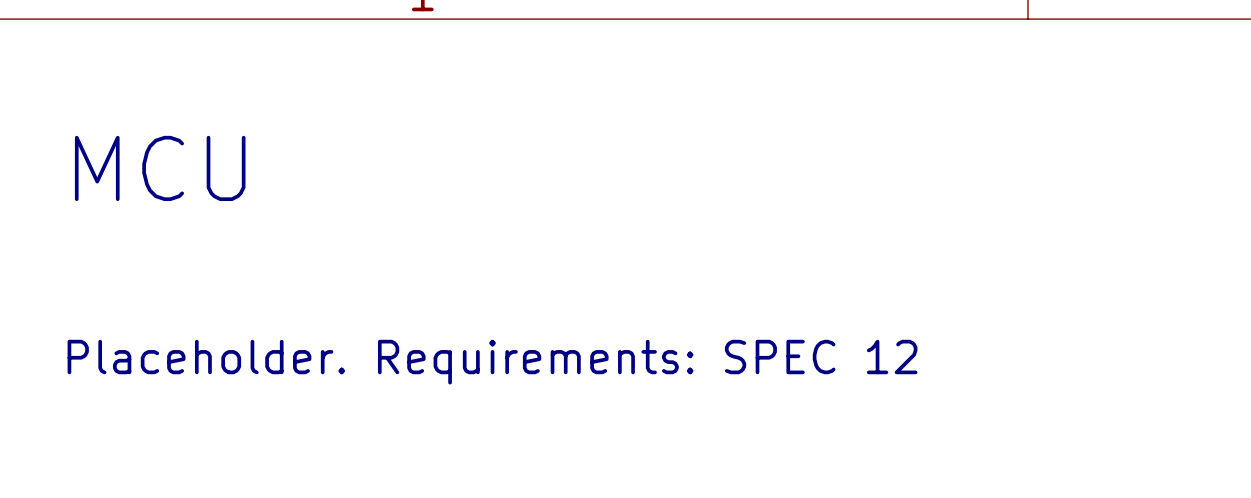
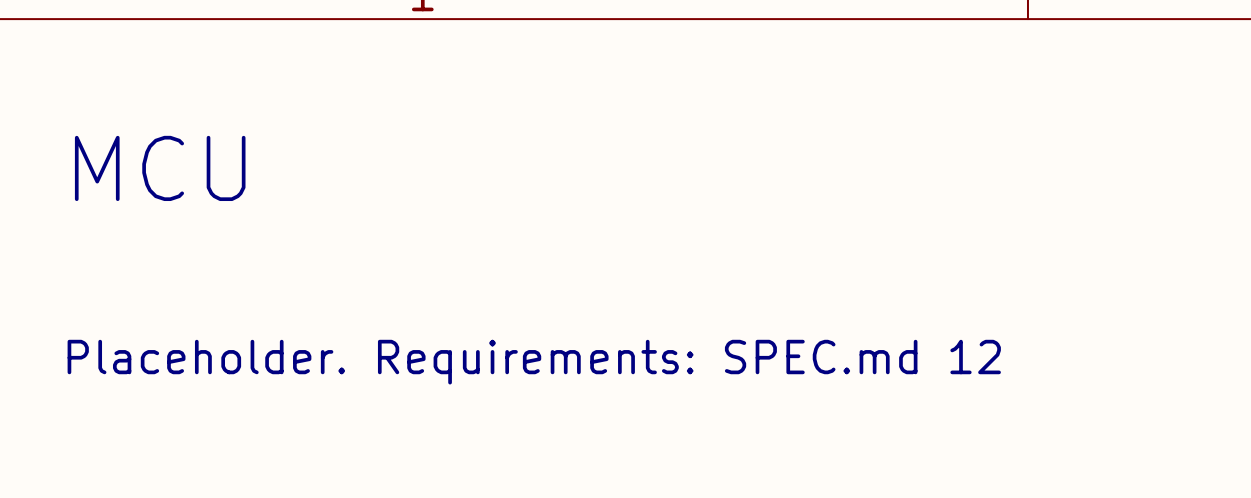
text: Placeholder. Requirements: SPEC 12 (492, 362) -> Placeholder. Requirements: SPEC.md 12 (534, 362)

